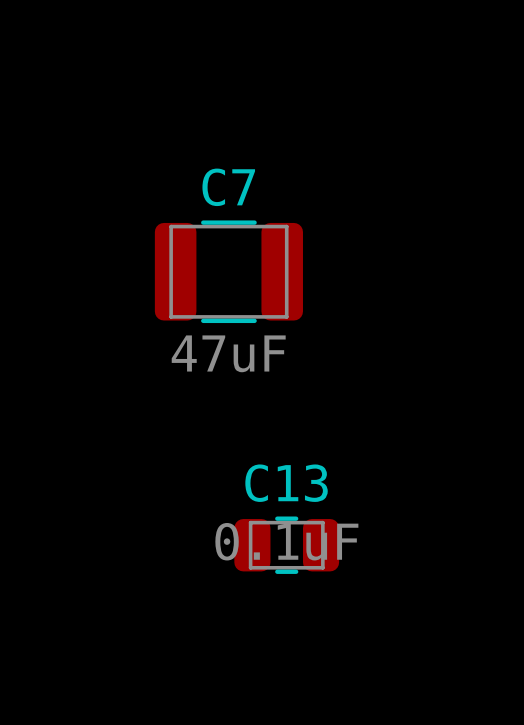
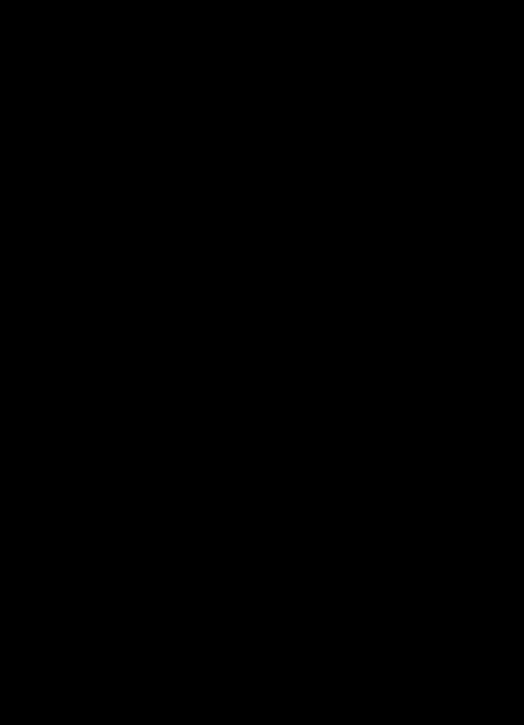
C7: 47uF (228, 271) -> none
C13: 0.1uF (286, 545) -> none

